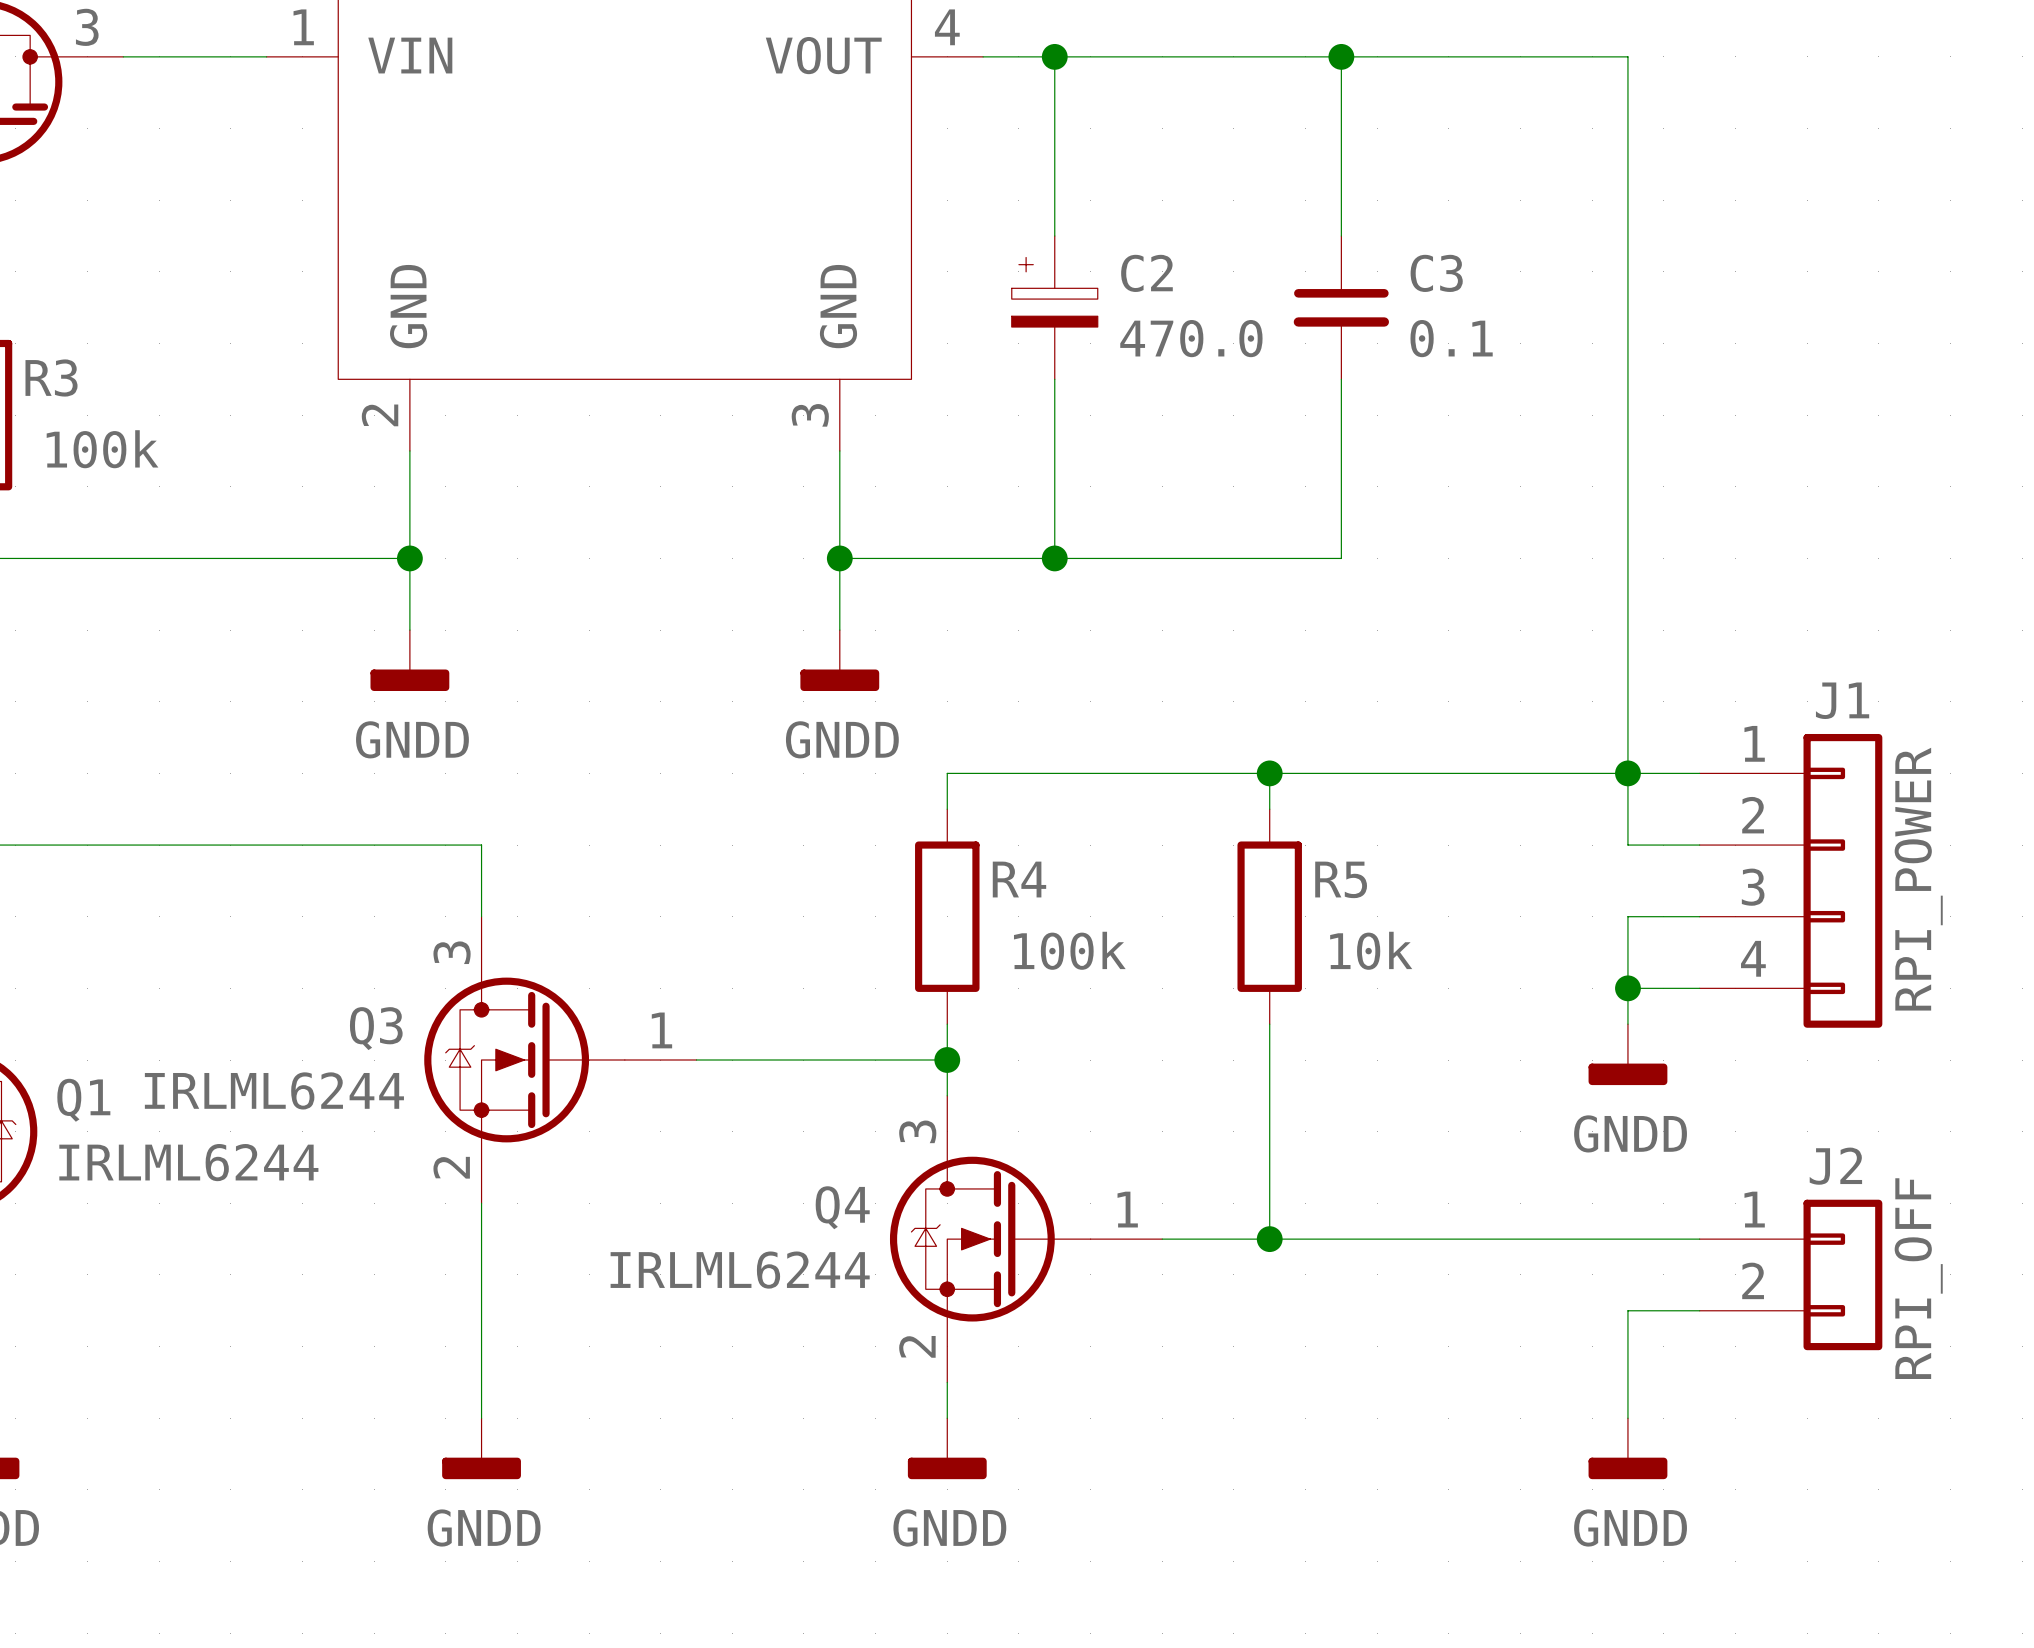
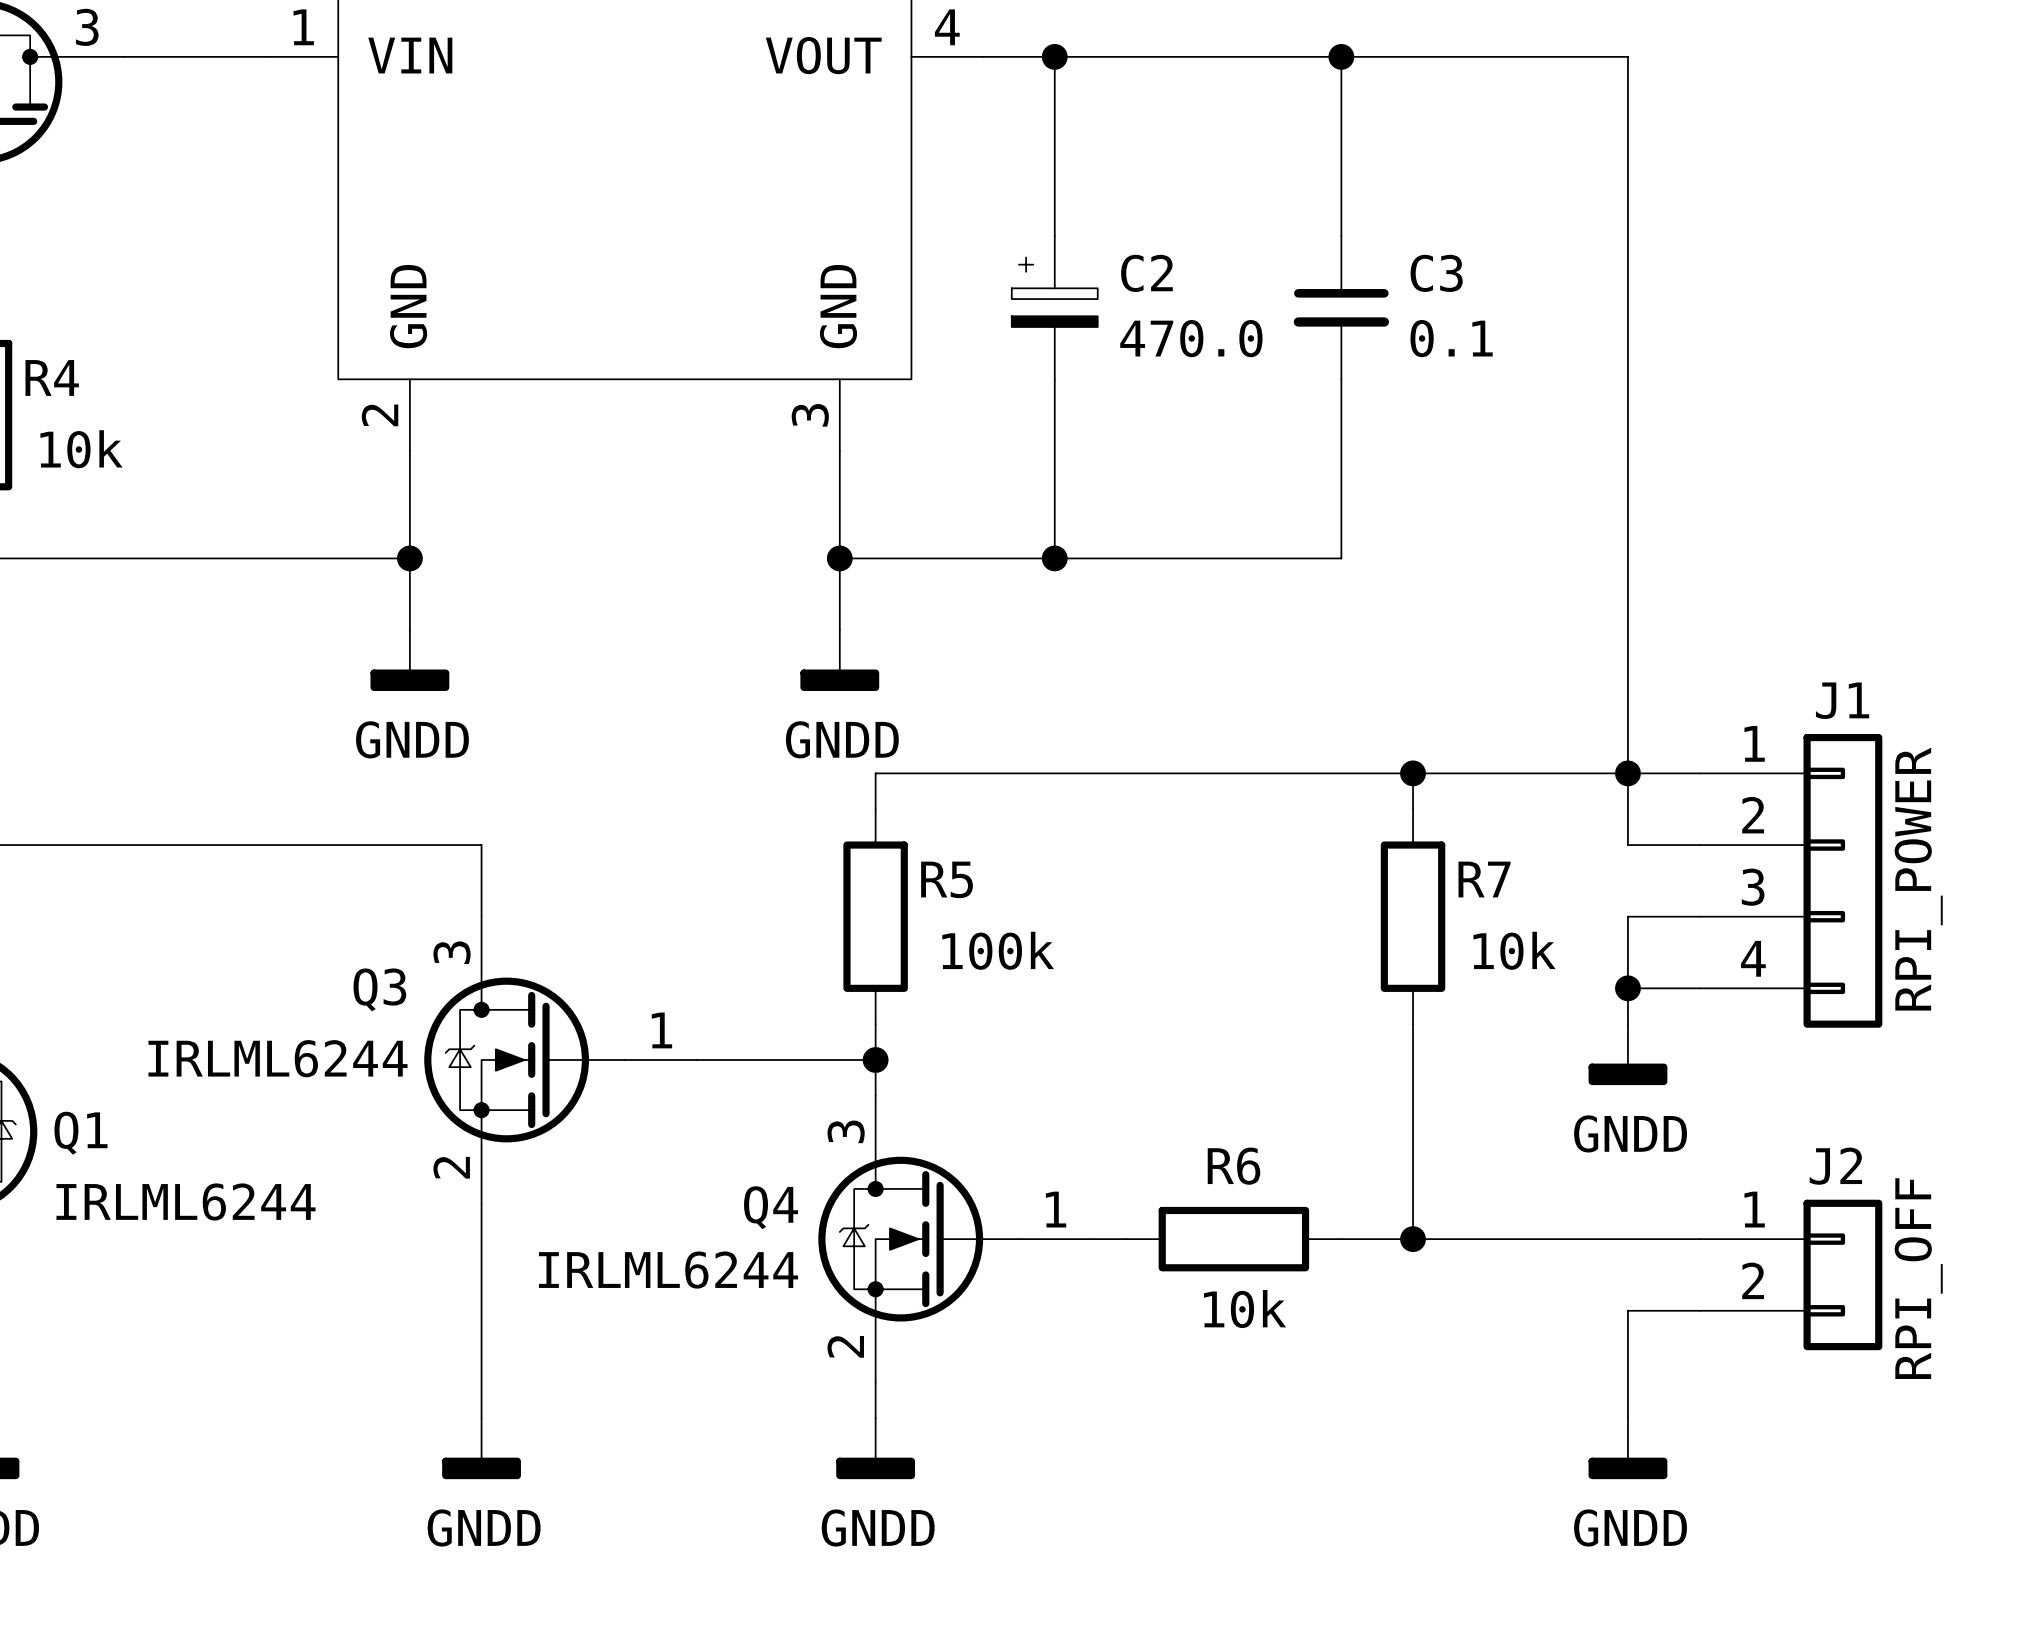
R3 name: R3 (51, 378) -> R4 (52, 377)
R3 value: 100k (102, 449) -> 10k (81, 449)
wire: (947, 773) (947, 809) -> (947, 773) (875, 773) (875, 809)
wire: (1269, 773) (1269, 809) -> (1413, 773) (1413, 809)
junction position: (1269, 773) -> (1413, 773)
R4: 100k (947, 916) -> none
R5 position: (1269, 916) -> (875, 916)
R7: none -> 10k (1413, 916)
R5 value: 10k (1371, 950) -> 100k (998, 950)
wire: (947, 1024) (947, 1095) -> (875, 1024) (875, 1095)
wire: (1269, 1024) (1269, 1239) -> (1413, 1024) (1413, 1239)
Q3 name position: Q3 (376, 1028) -> Q3 (379, 989)
wire: (875, 1060) (947, 1060) -> none
junction position: (947, 1060) -> (875, 1060)
Q3 value position: IRLML6244 (274, 1090) -> IRLML6244 (278, 1058)
Q1 name position: Q1 (83, 1100) -> Q1 (80, 1133)
Q1 value position: IRLML6244 (188, 1162) -> IRLML6244 (186, 1201)
Q4 position: (1026, 1239) -> (954, 1239)
wire: (1162, 1239) (1341, 1239) -> none
R6: none -> 10k (1233, 1239)
junction position: (1269, 1239) -> (1413, 1239)
wire: (947, 1382) (947, 1418) -> (875, 1382) (875, 1418)
power symbol position: GNDD (947, 1448) -> GNDD (875, 1448)

